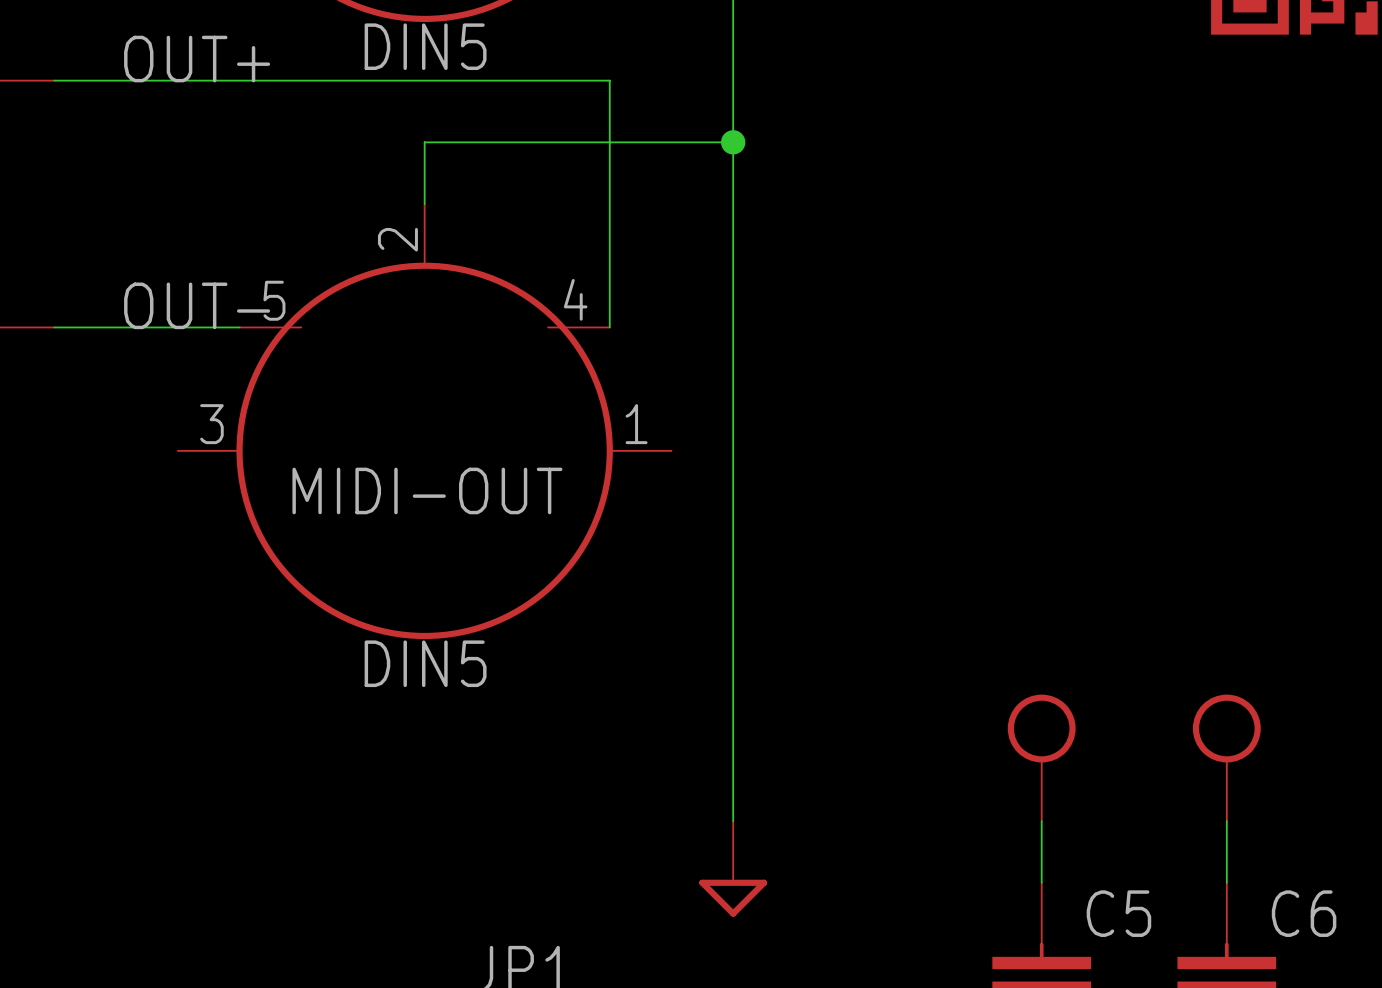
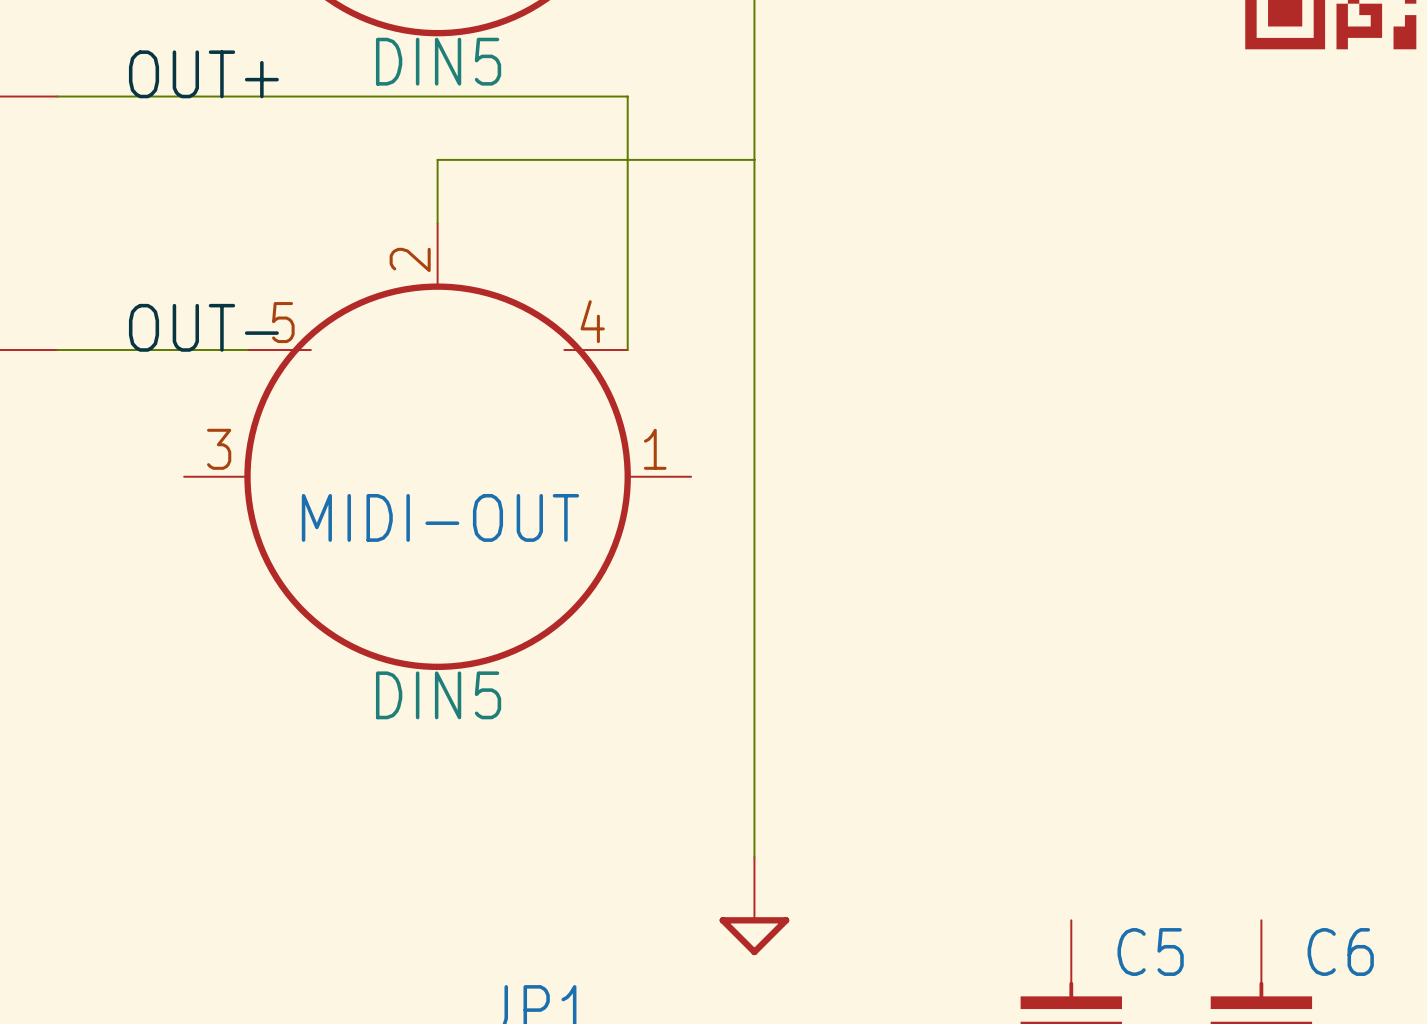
junction: (733, 142) -> none
power symbol: (1041, 757) -> none
power symbol: (1226, 757) -> none
wire: (1041, 821) (1041, 882) -> none
wire: (1226, 821) (1226, 882) -> none

